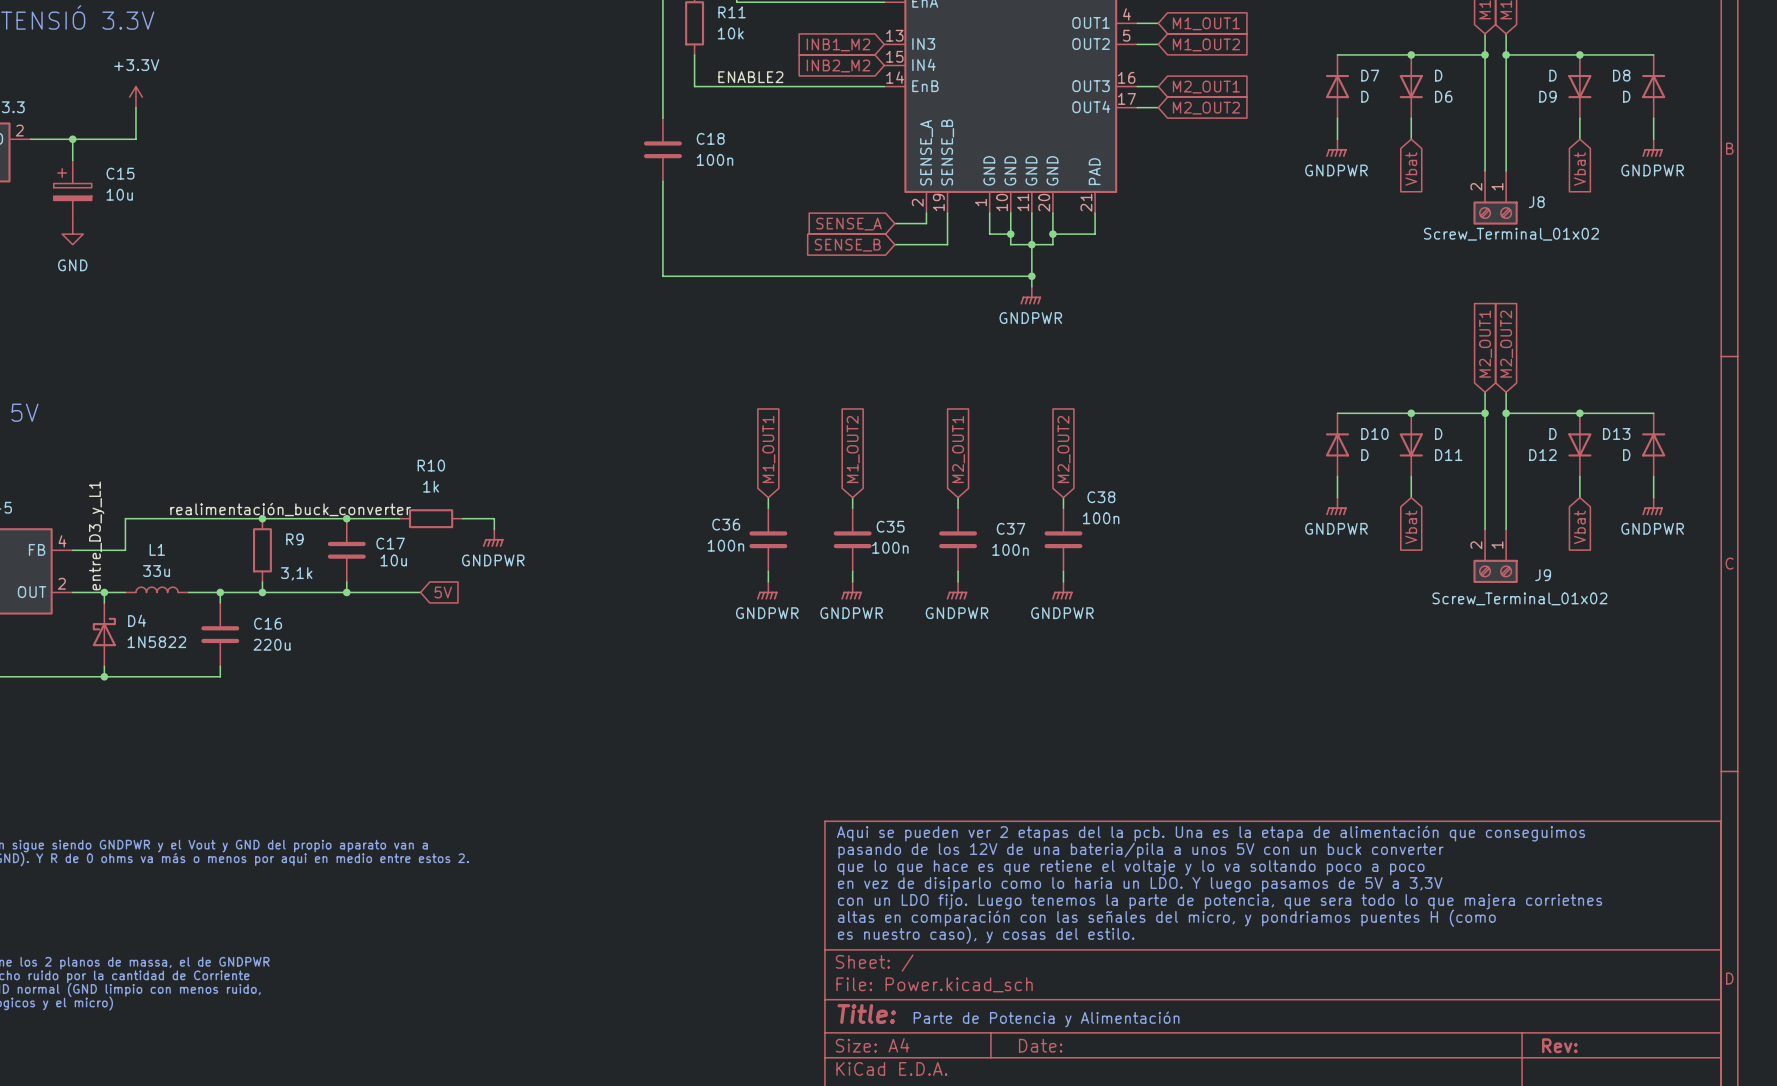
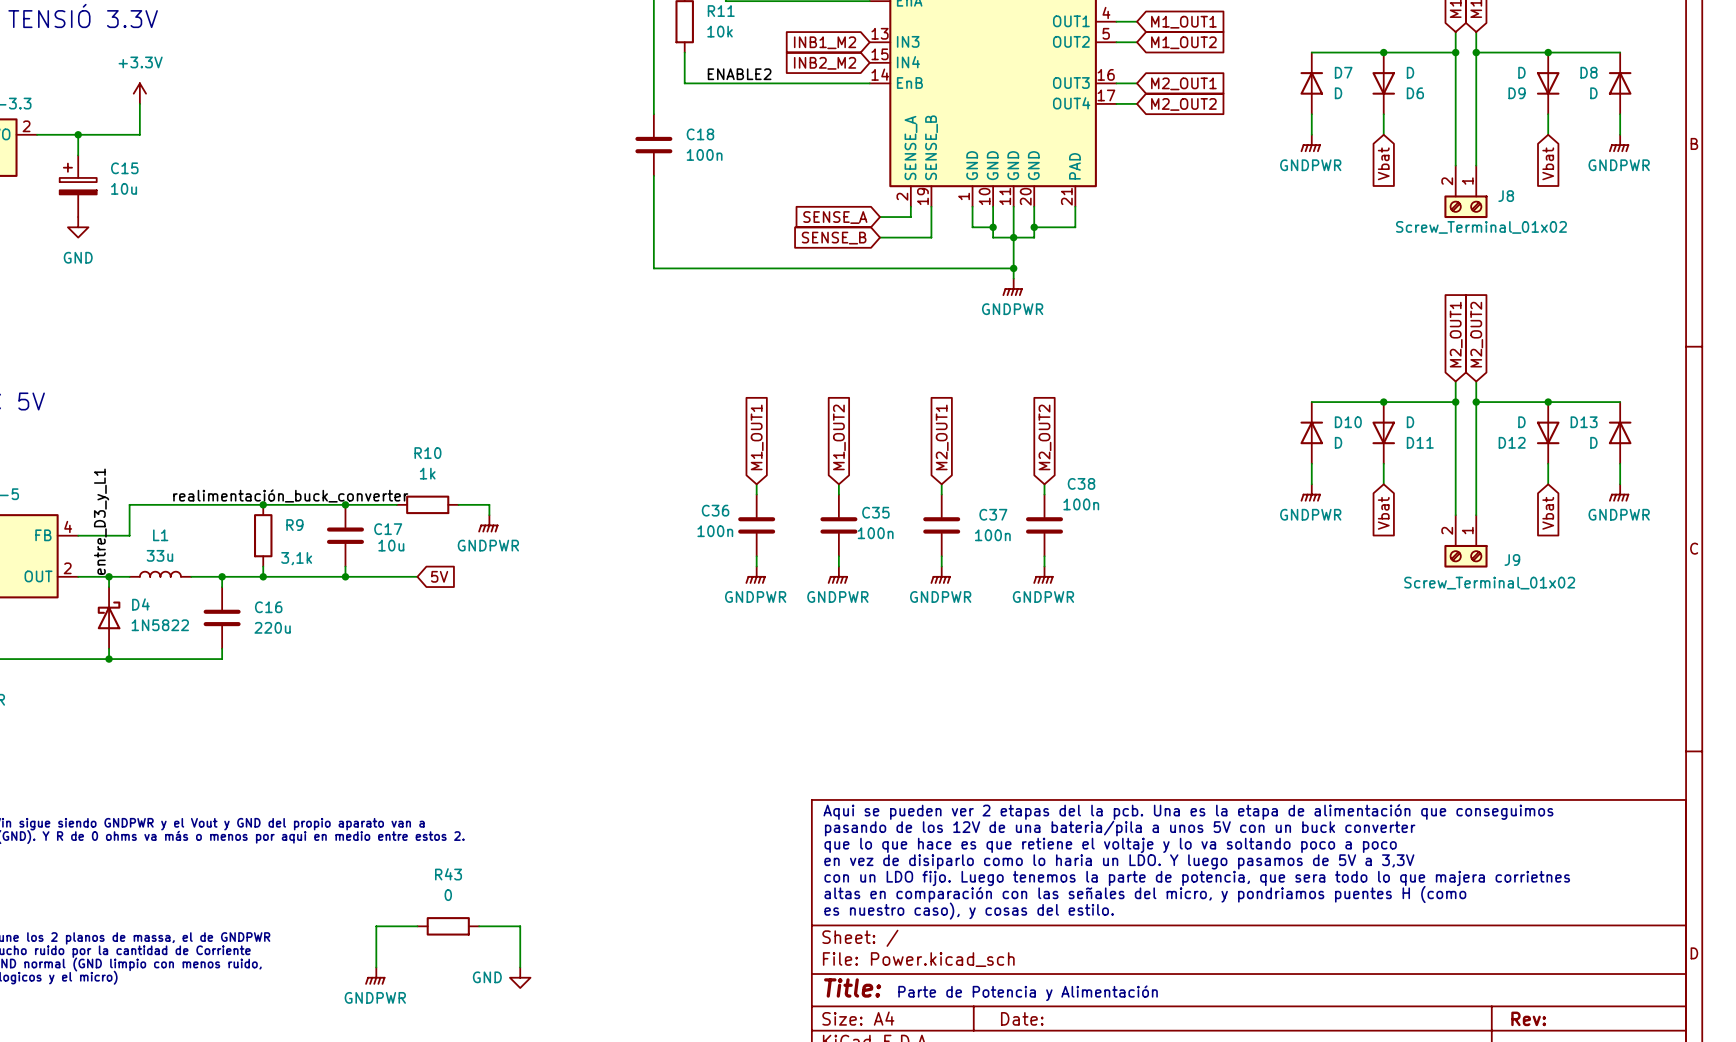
wire: none -> (417, 926) (376, 926) (376, 967)
R43: none -> 0 (448, 926)
wire: none -> (479, 926) (520, 926) (520, 967)
power symbol: none -> GNDPWR (375, 976)
power symbol: none -> GND (520, 977)

